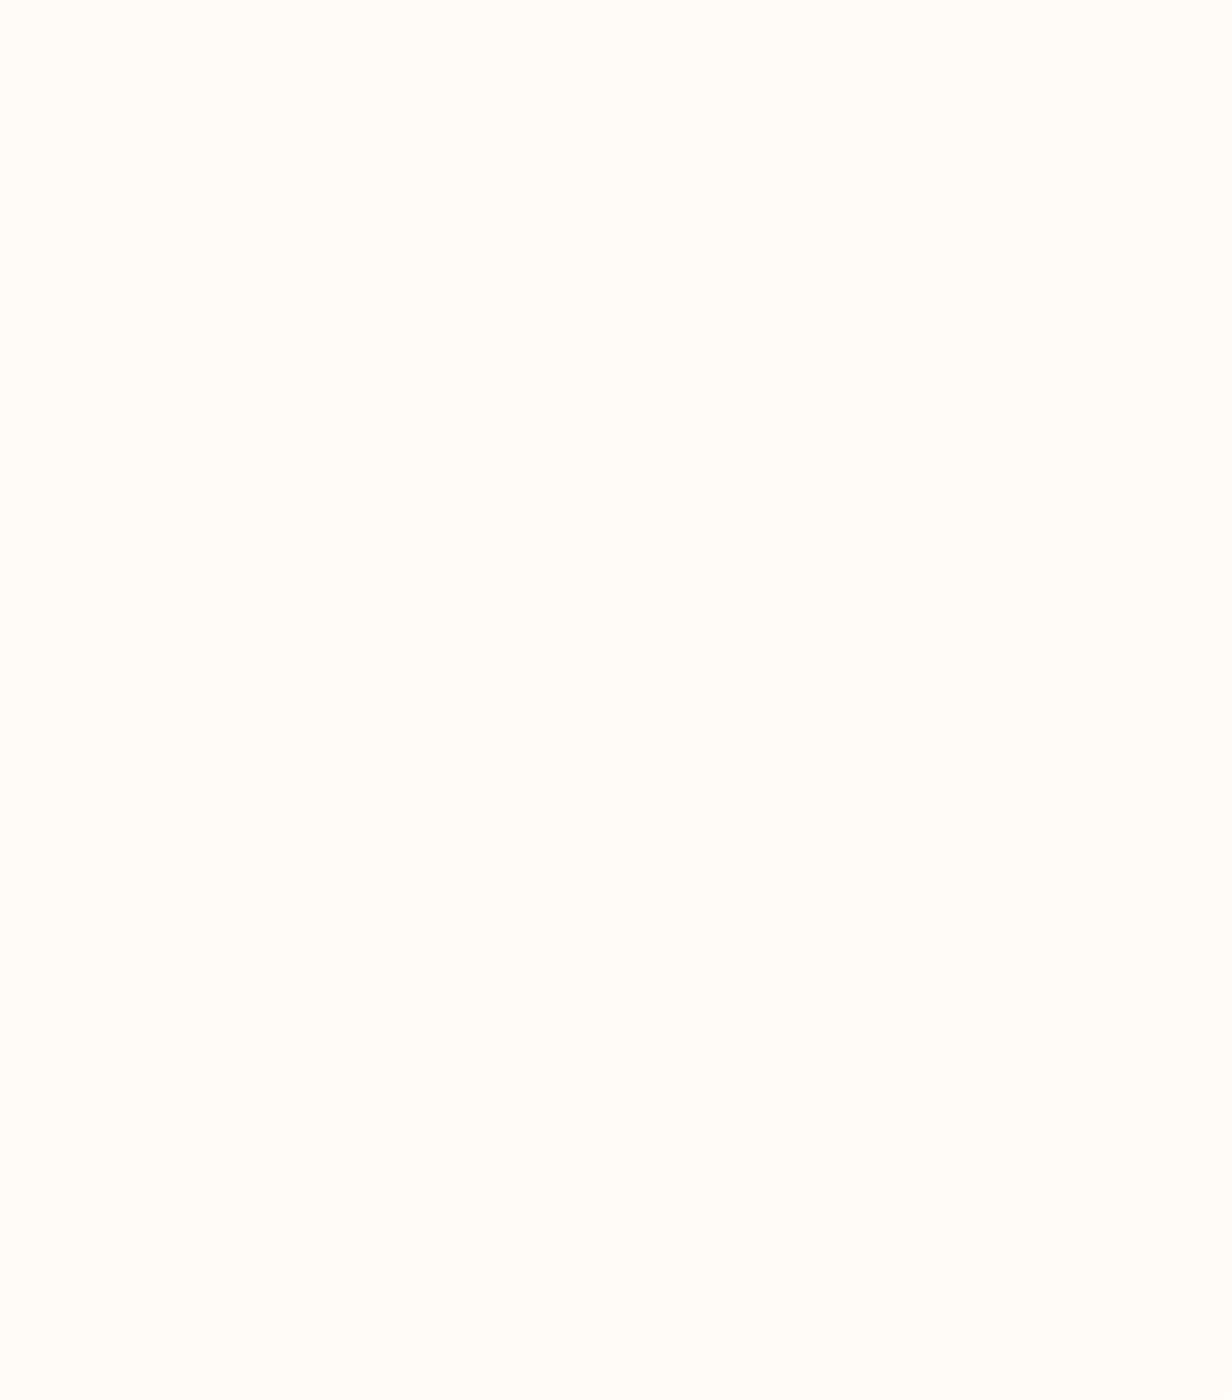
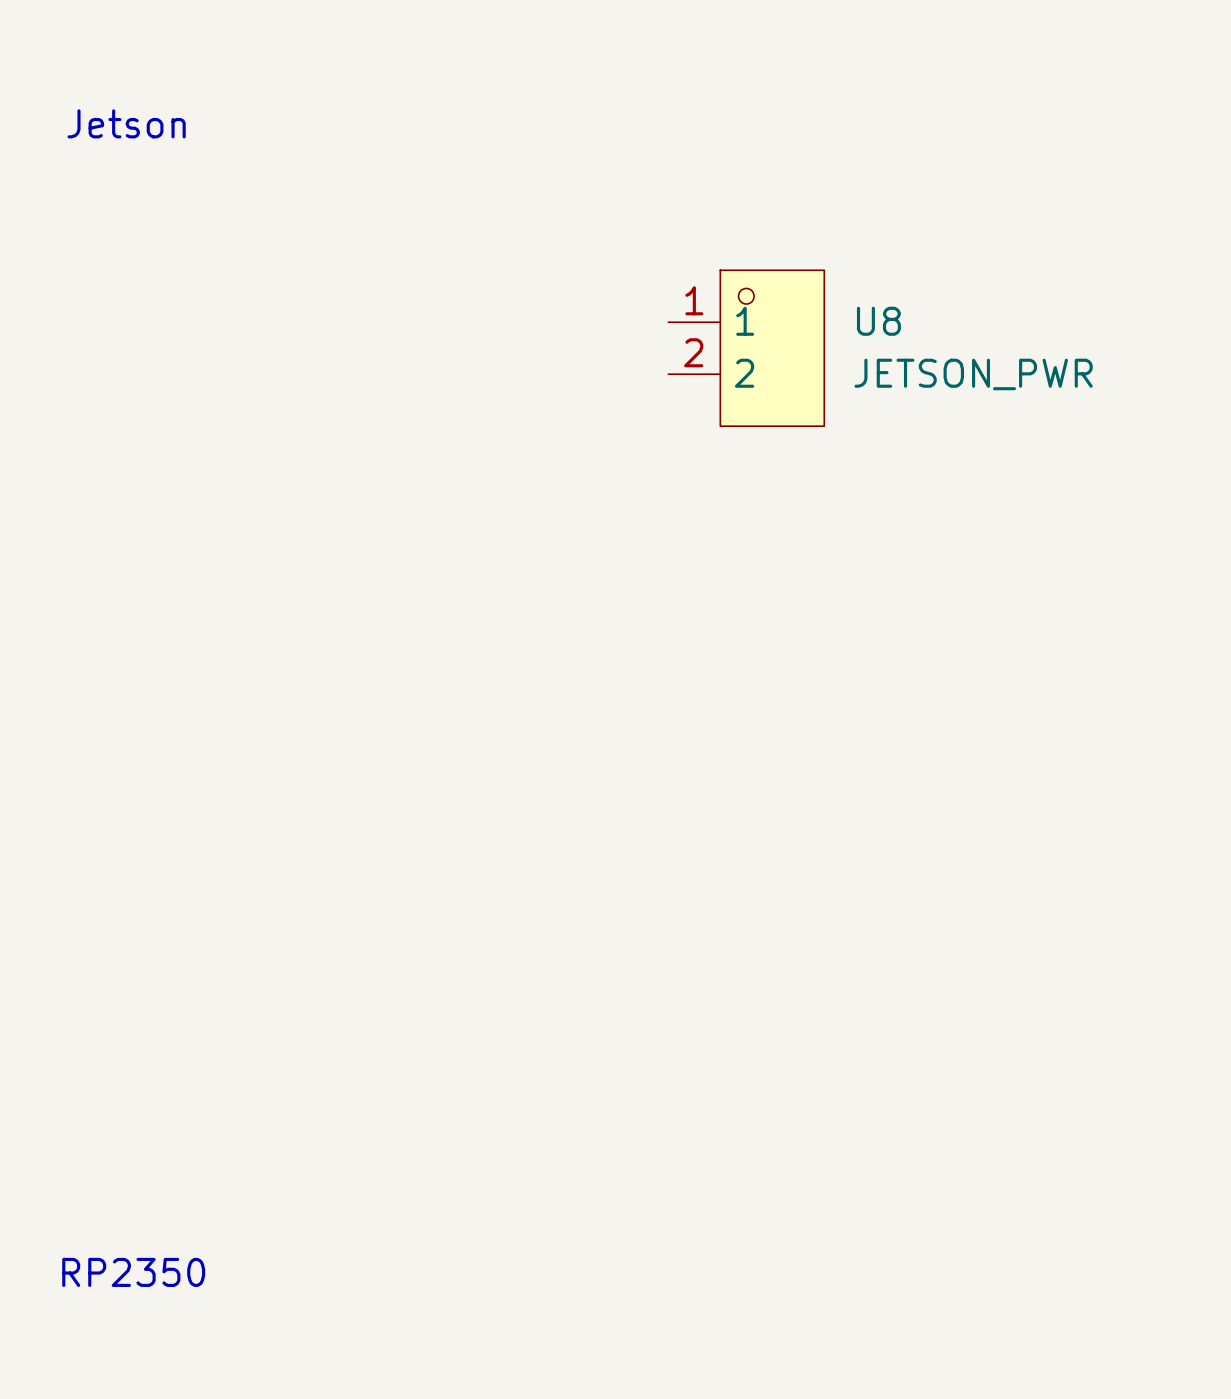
text: none -> Jetson (126, 123)
U8: none -> JETSON_PWR (746, 348)
text: none -> RP2350 (133, 1272)

